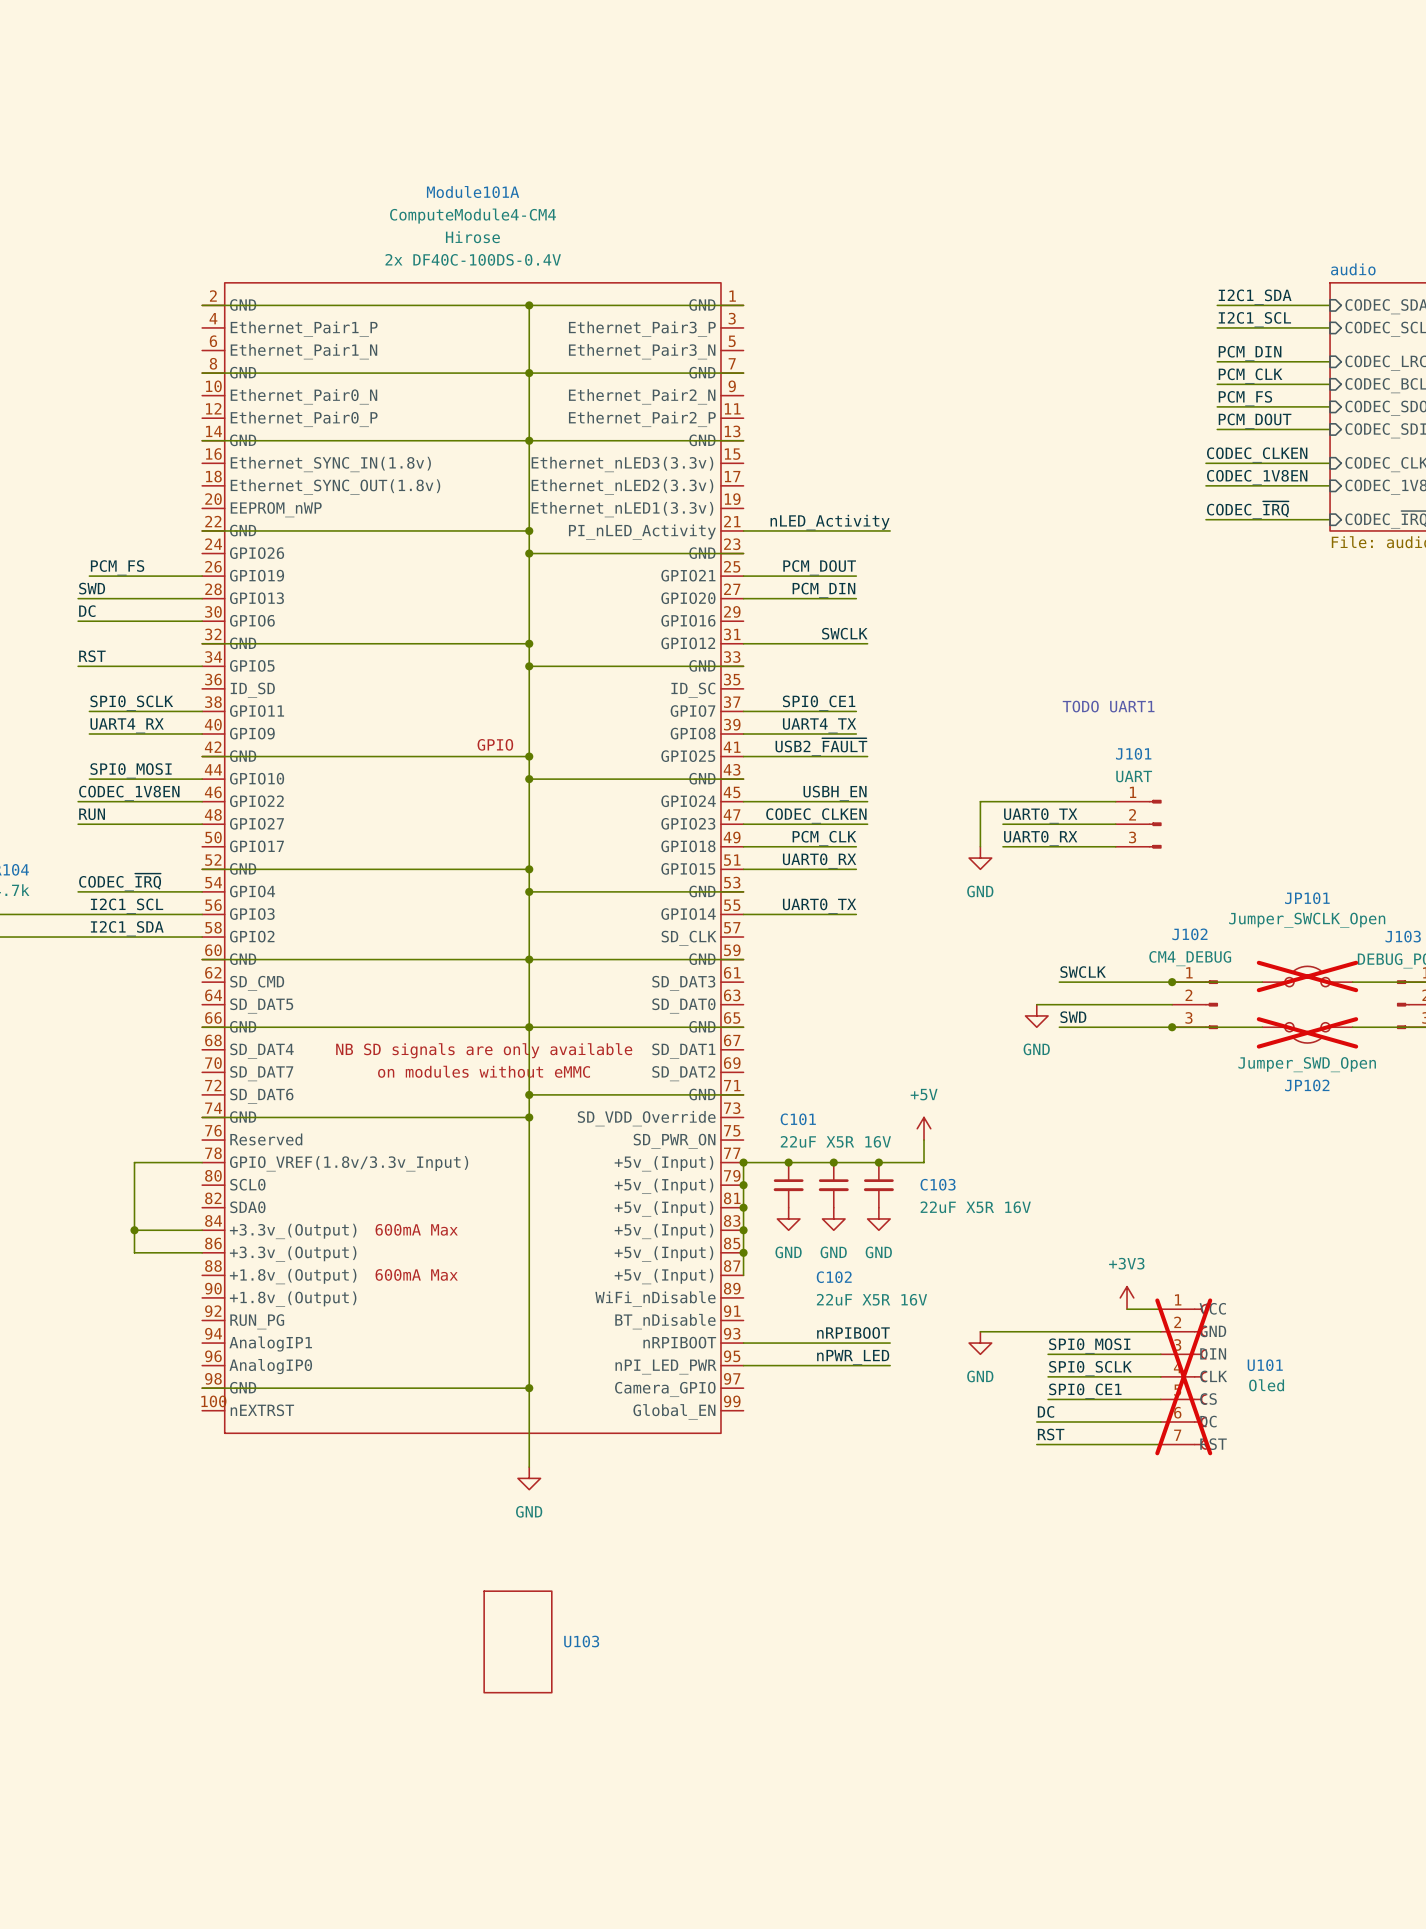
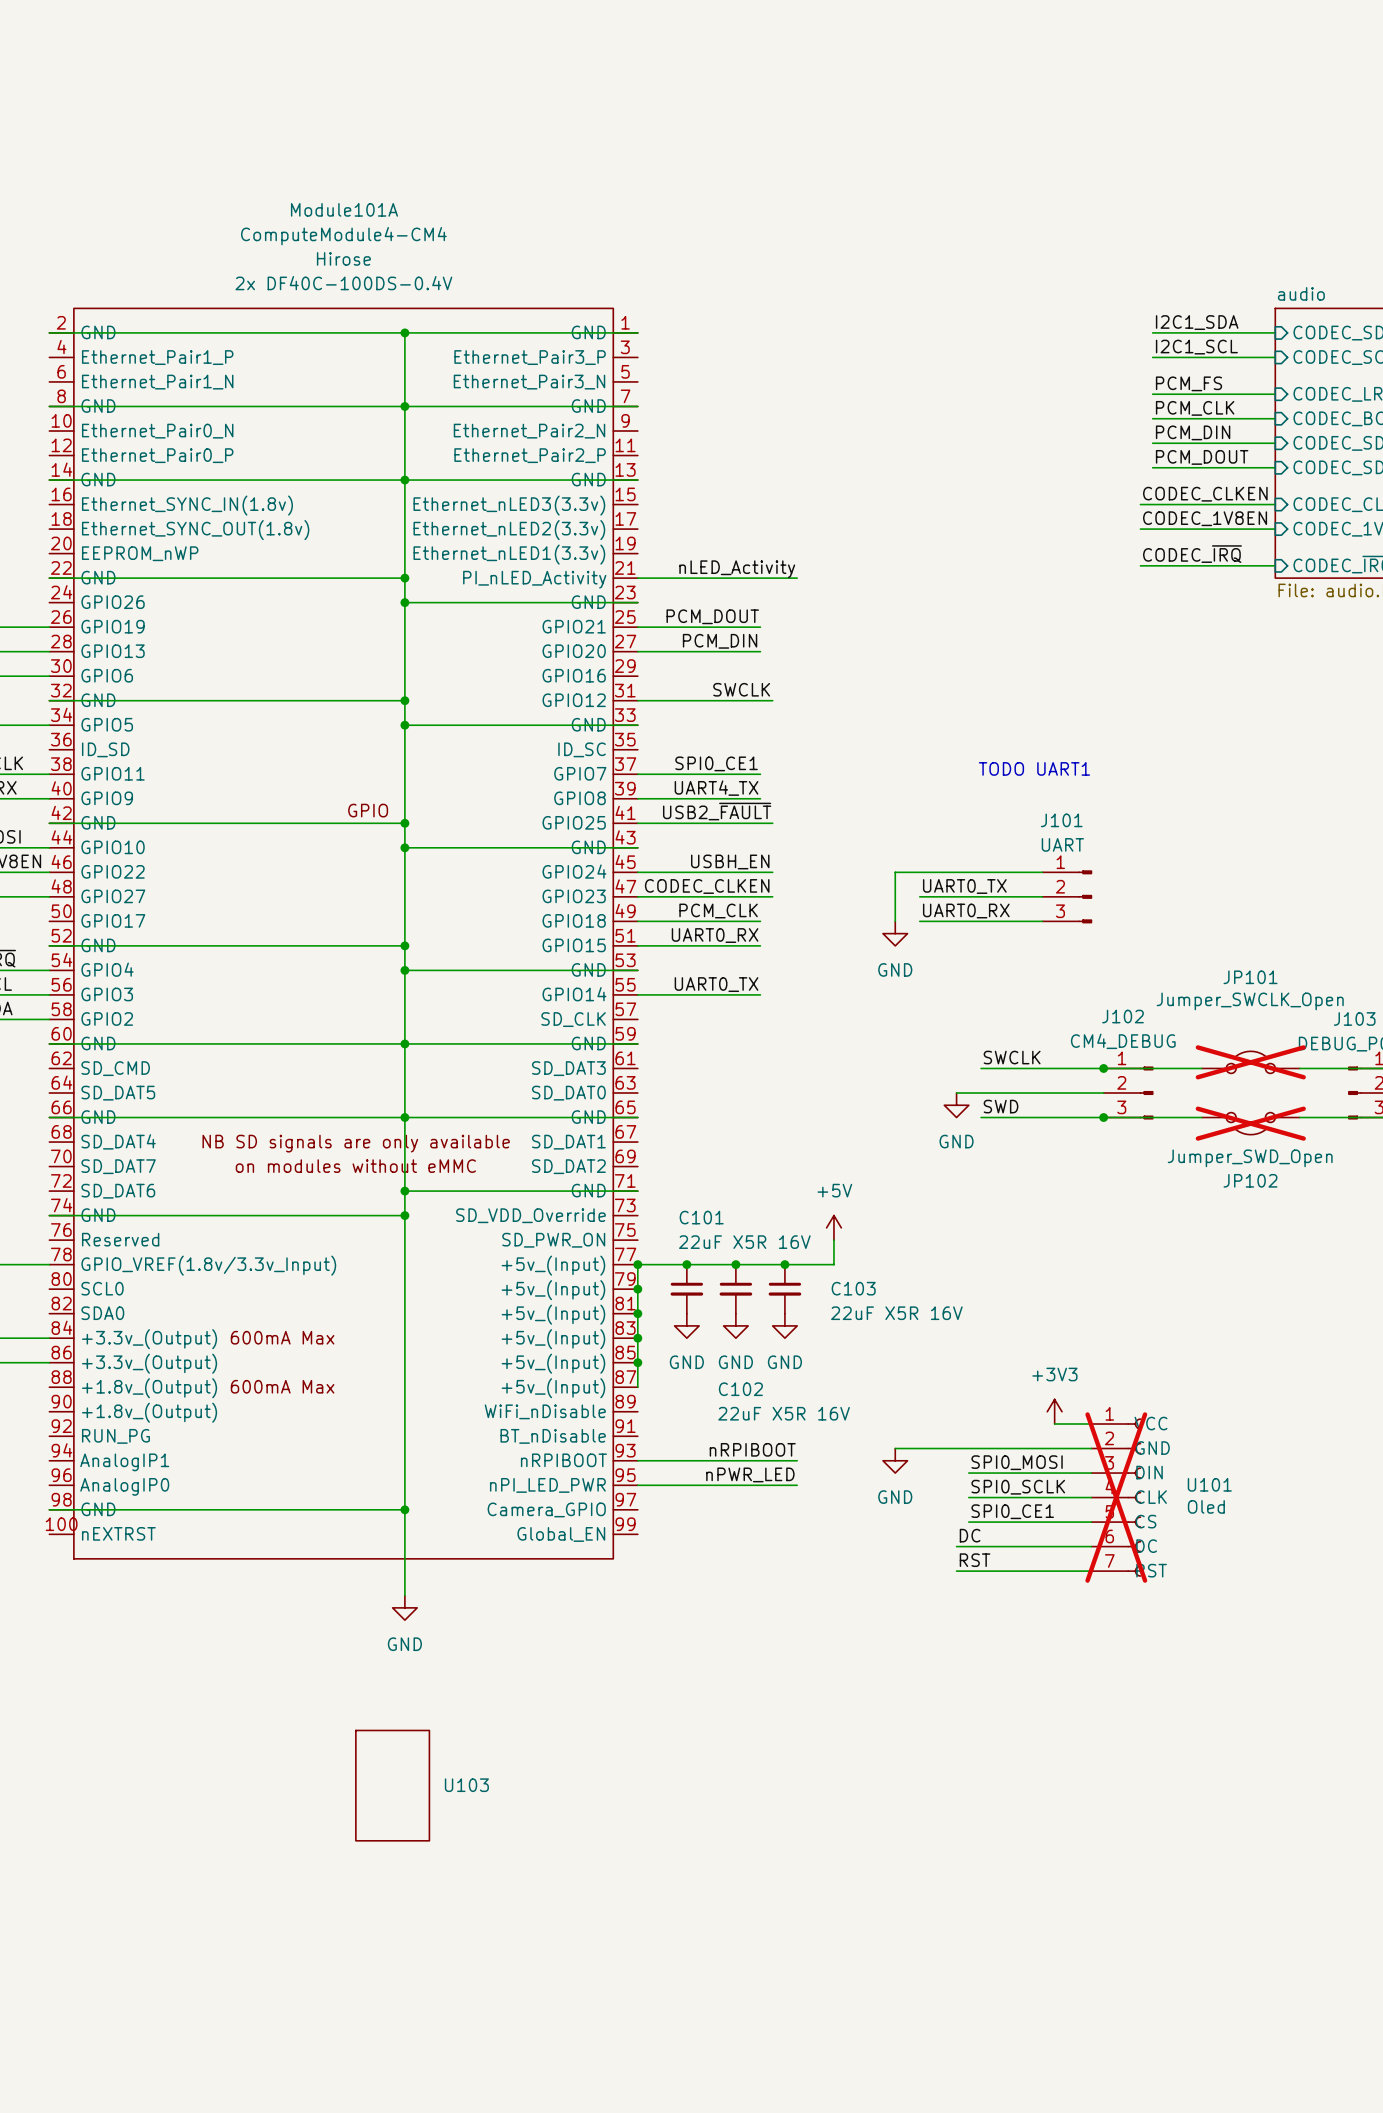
label: PCM_DIN (1250, 353) -> PCM_FS (1189, 383)
label: PCM_FS (1245, 398) -> PCM_DIN (1193, 432)

